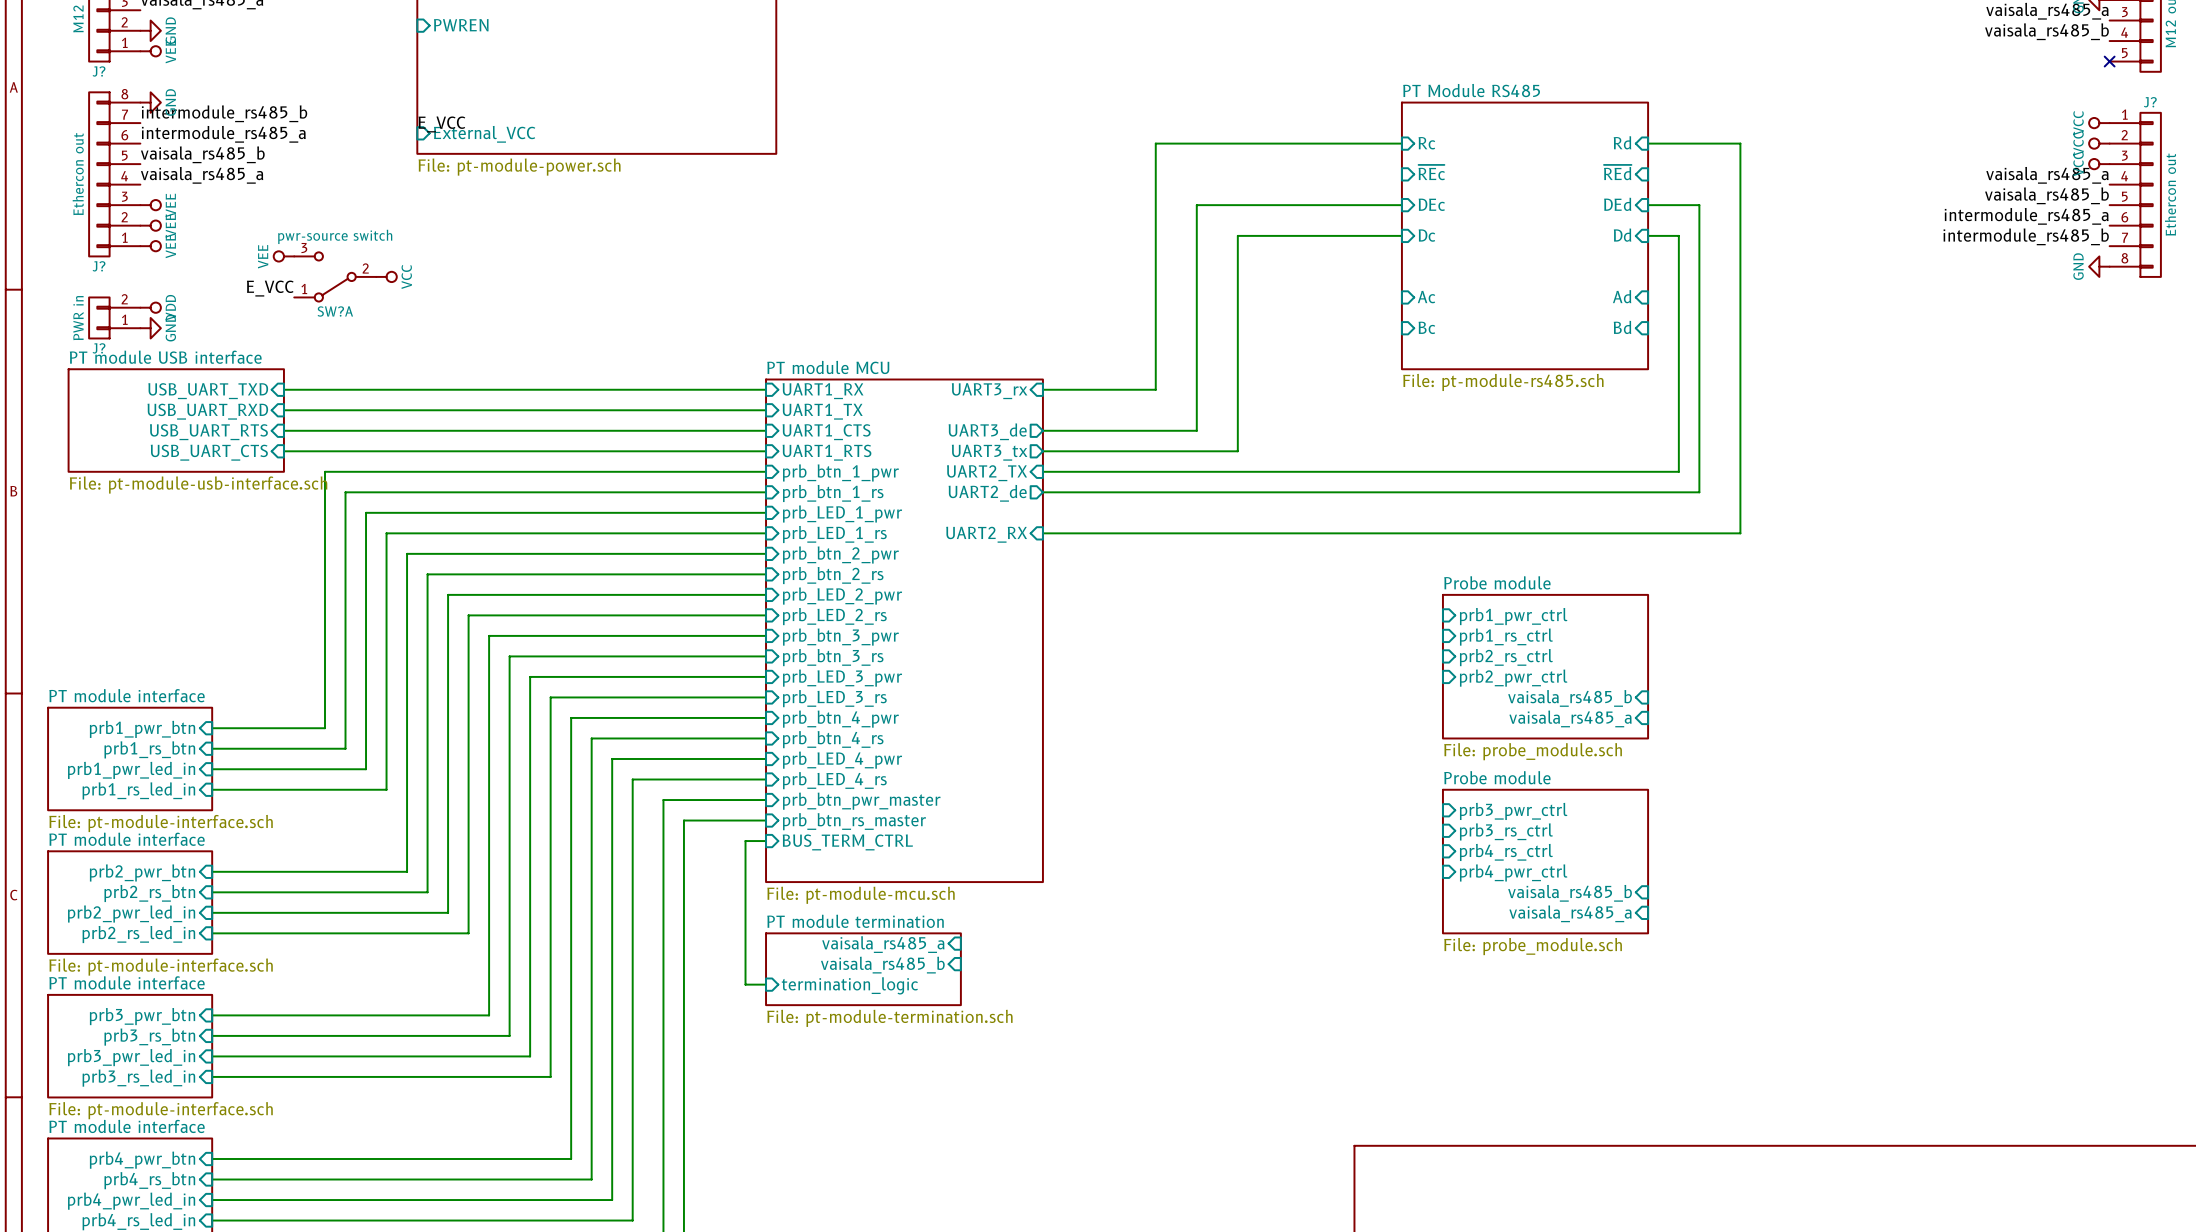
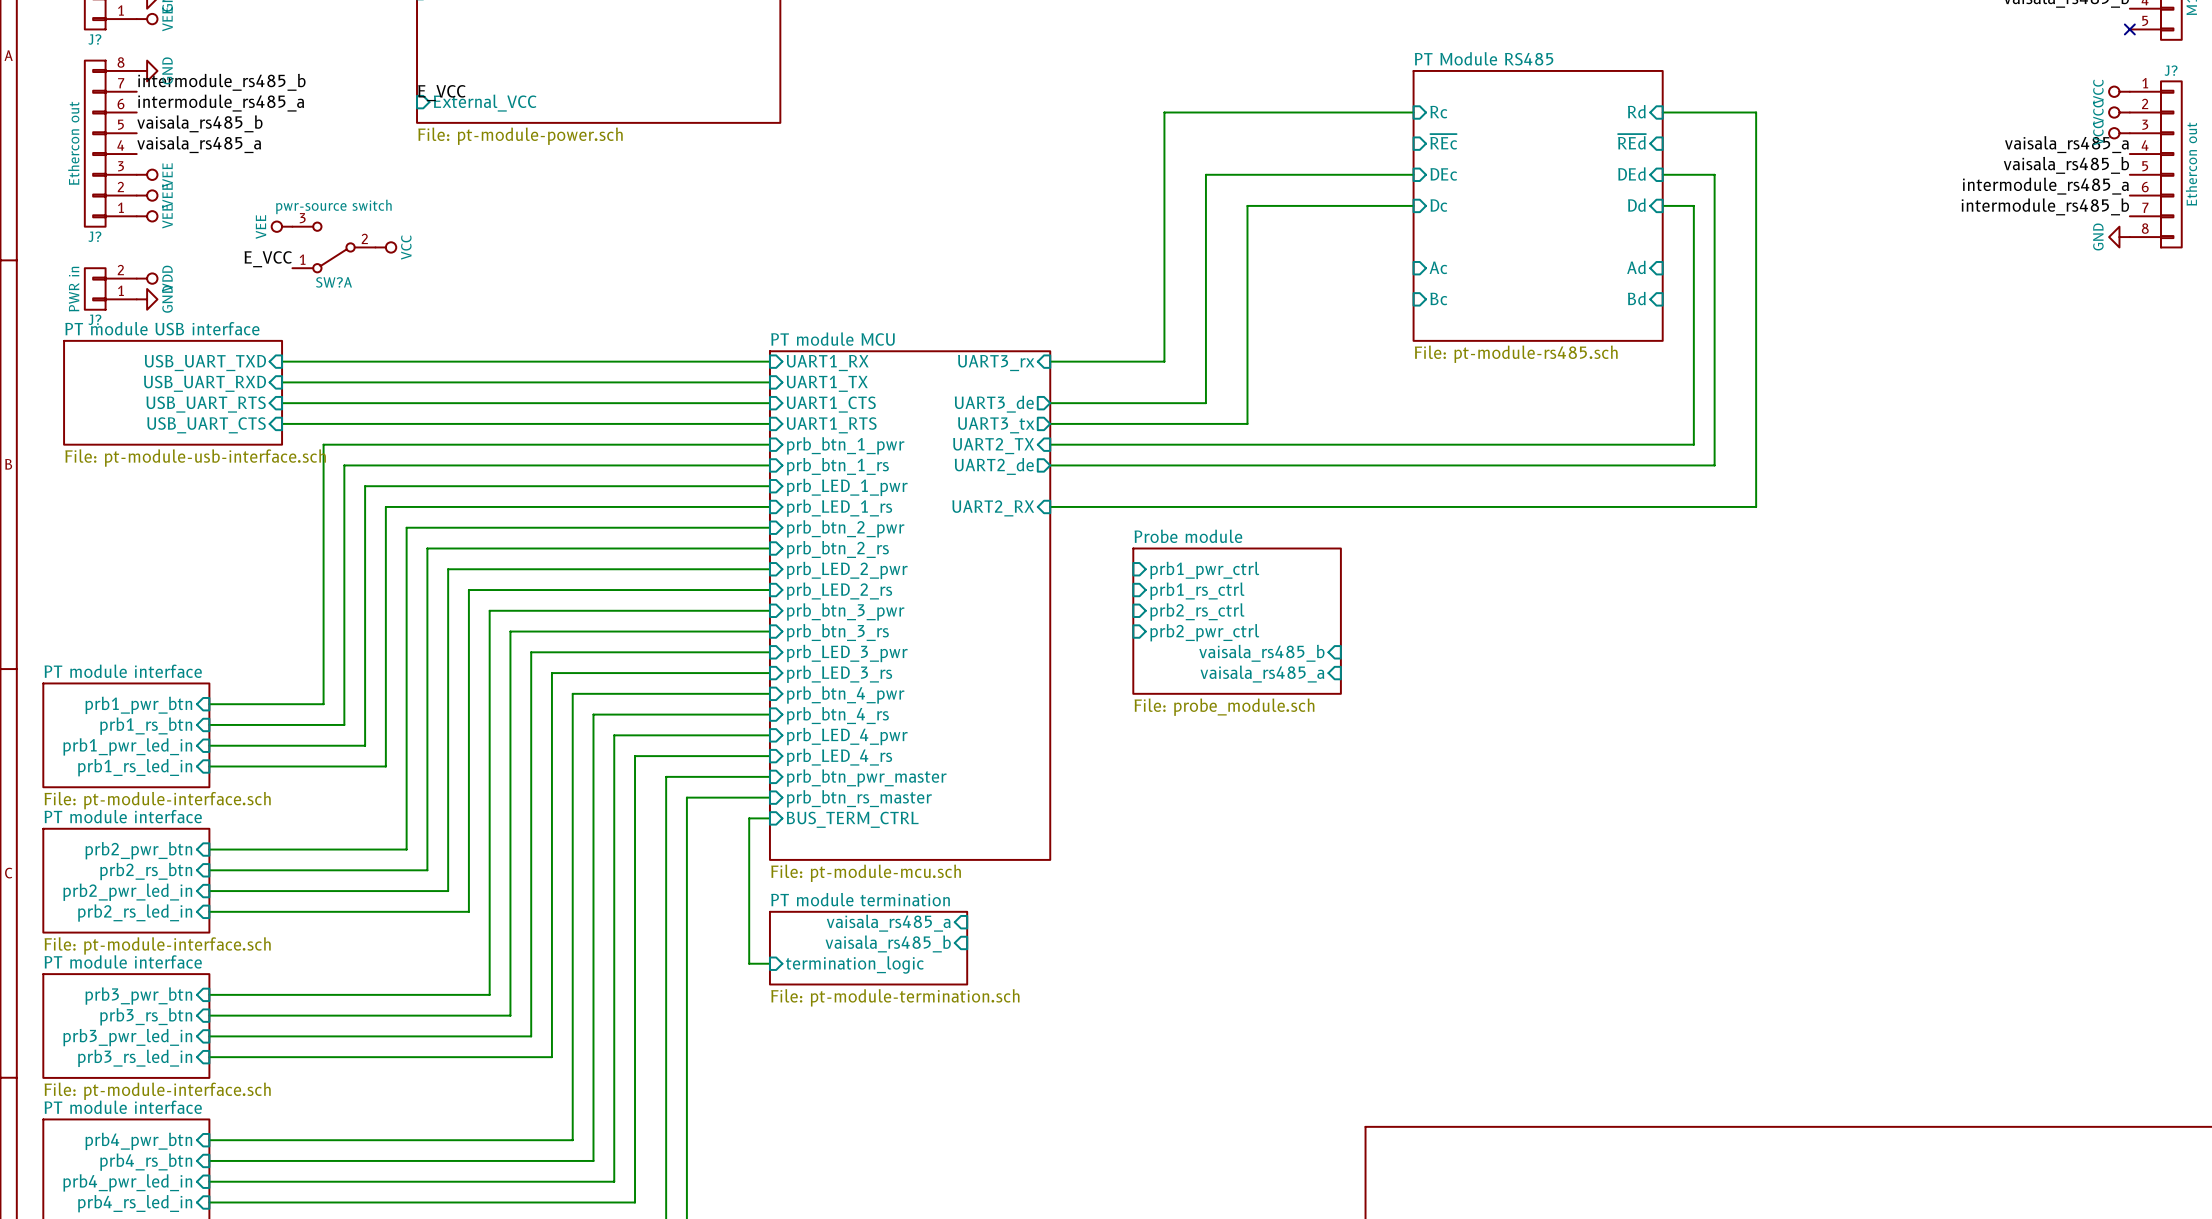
sheet pin: none -> prb1_pwr_ctrl (1204, 570)
sheet pin: none -> prb1_rs_ctrl (1197, 591)
sheet pin: prb1_pwr_ctrl (1513, 616) -> none
sheet pin: none -> prb2_rs_ctrl (1197, 611)
sheet pin: prb1_rs_ctrl (1506, 637) -> none
sheet Probe module: none -> File: probe_module.sch (1237, 621)
sheet pin: none -> prb2_pwr_ctrl (1204, 632)
sheet pin: prb2_rs_ctrl (1506, 657) -> none
sheet Probe module: File: probe_module.sch (1545, 666) -> none
sheet pin: none -> vaisala_rs485_b (1261, 653)
sheet pin: prb2_pwr_ctrl (1513, 678) -> none
sheet pin: none -> vaisala_rs485_a (1262, 674)
sheet pin: vaisala_rs485_b (1570, 698) -> none
sheet pin: vaisala_rs485_a (1570, 718) -> none
sheet pin: prb3_pwr_ctrl (1513, 811) -> none
sheet pin: prb3_rs_ctrl (1506, 831) -> none
sheet pin: prb4_rs_ctrl (1506, 852) -> none
sheet Probe module: File: probe_module.sch (1545, 861) -> none
sheet pin: prb4_pwr_ctrl (1513, 872) -> none
sheet pin: vaisala_rs485_b (1570, 893) -> none
sheet pin: vaisala_rs485_a (1570, 913) -> none

